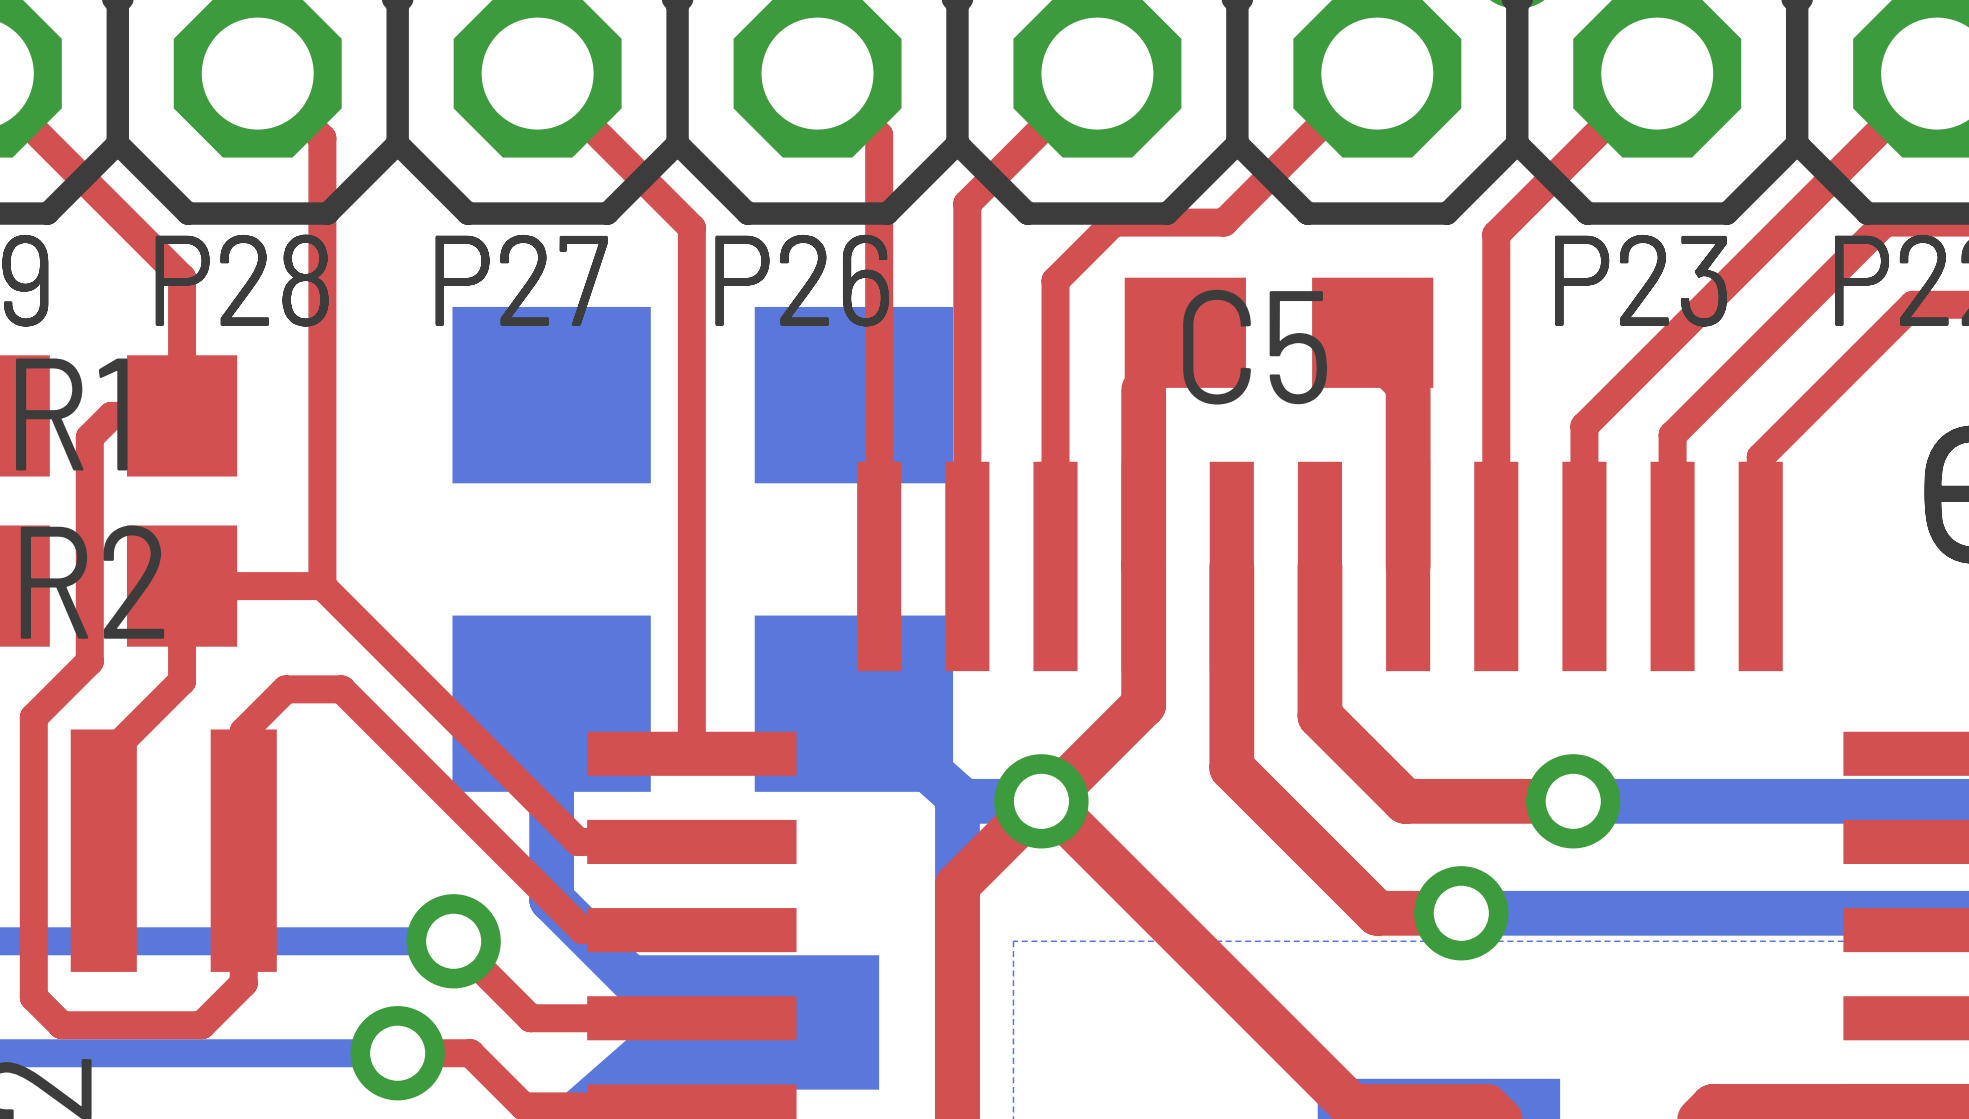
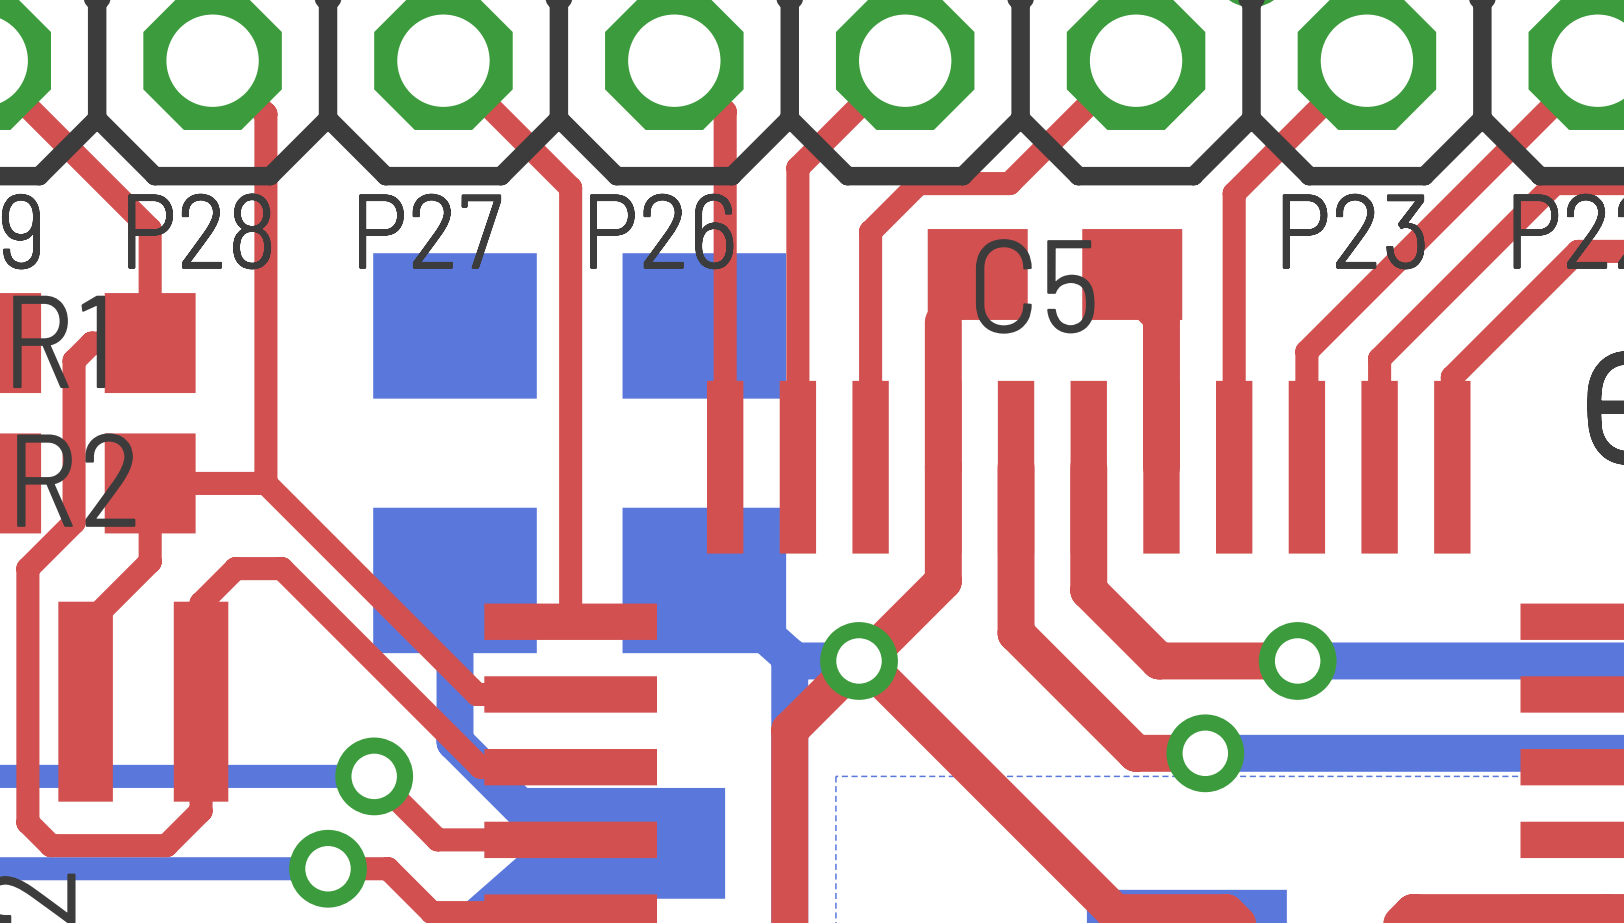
top track: (89, 633) (89, 661) (33, 717) -> (74, 522) (27, 568) (27, 591)

